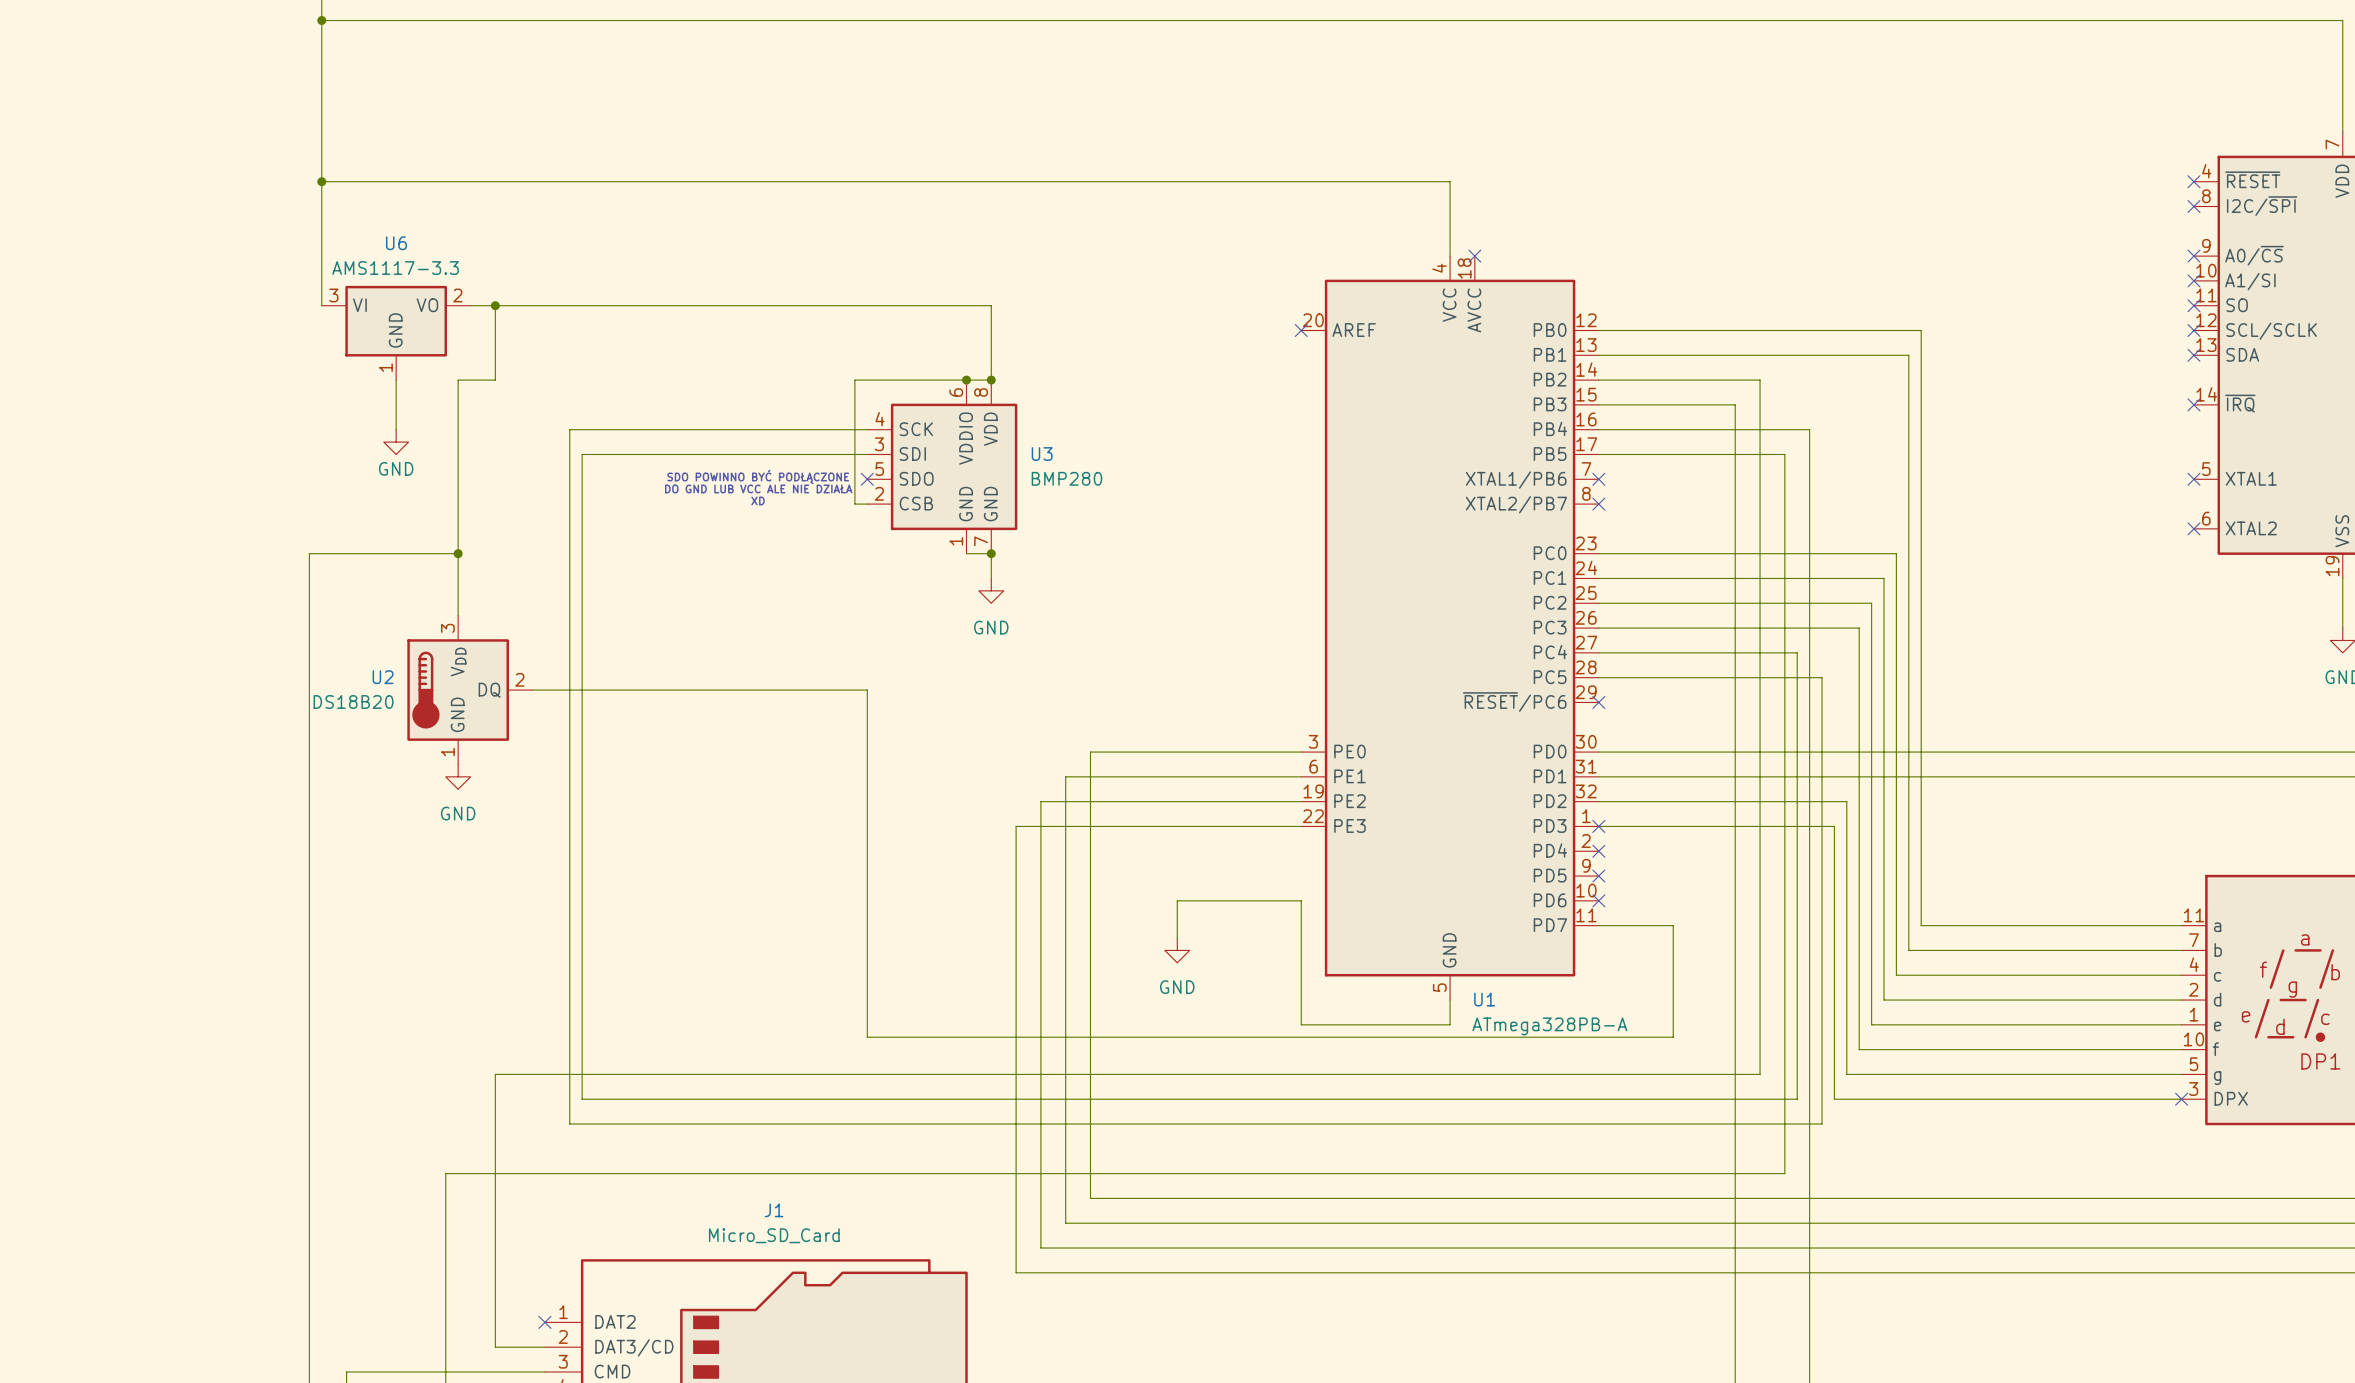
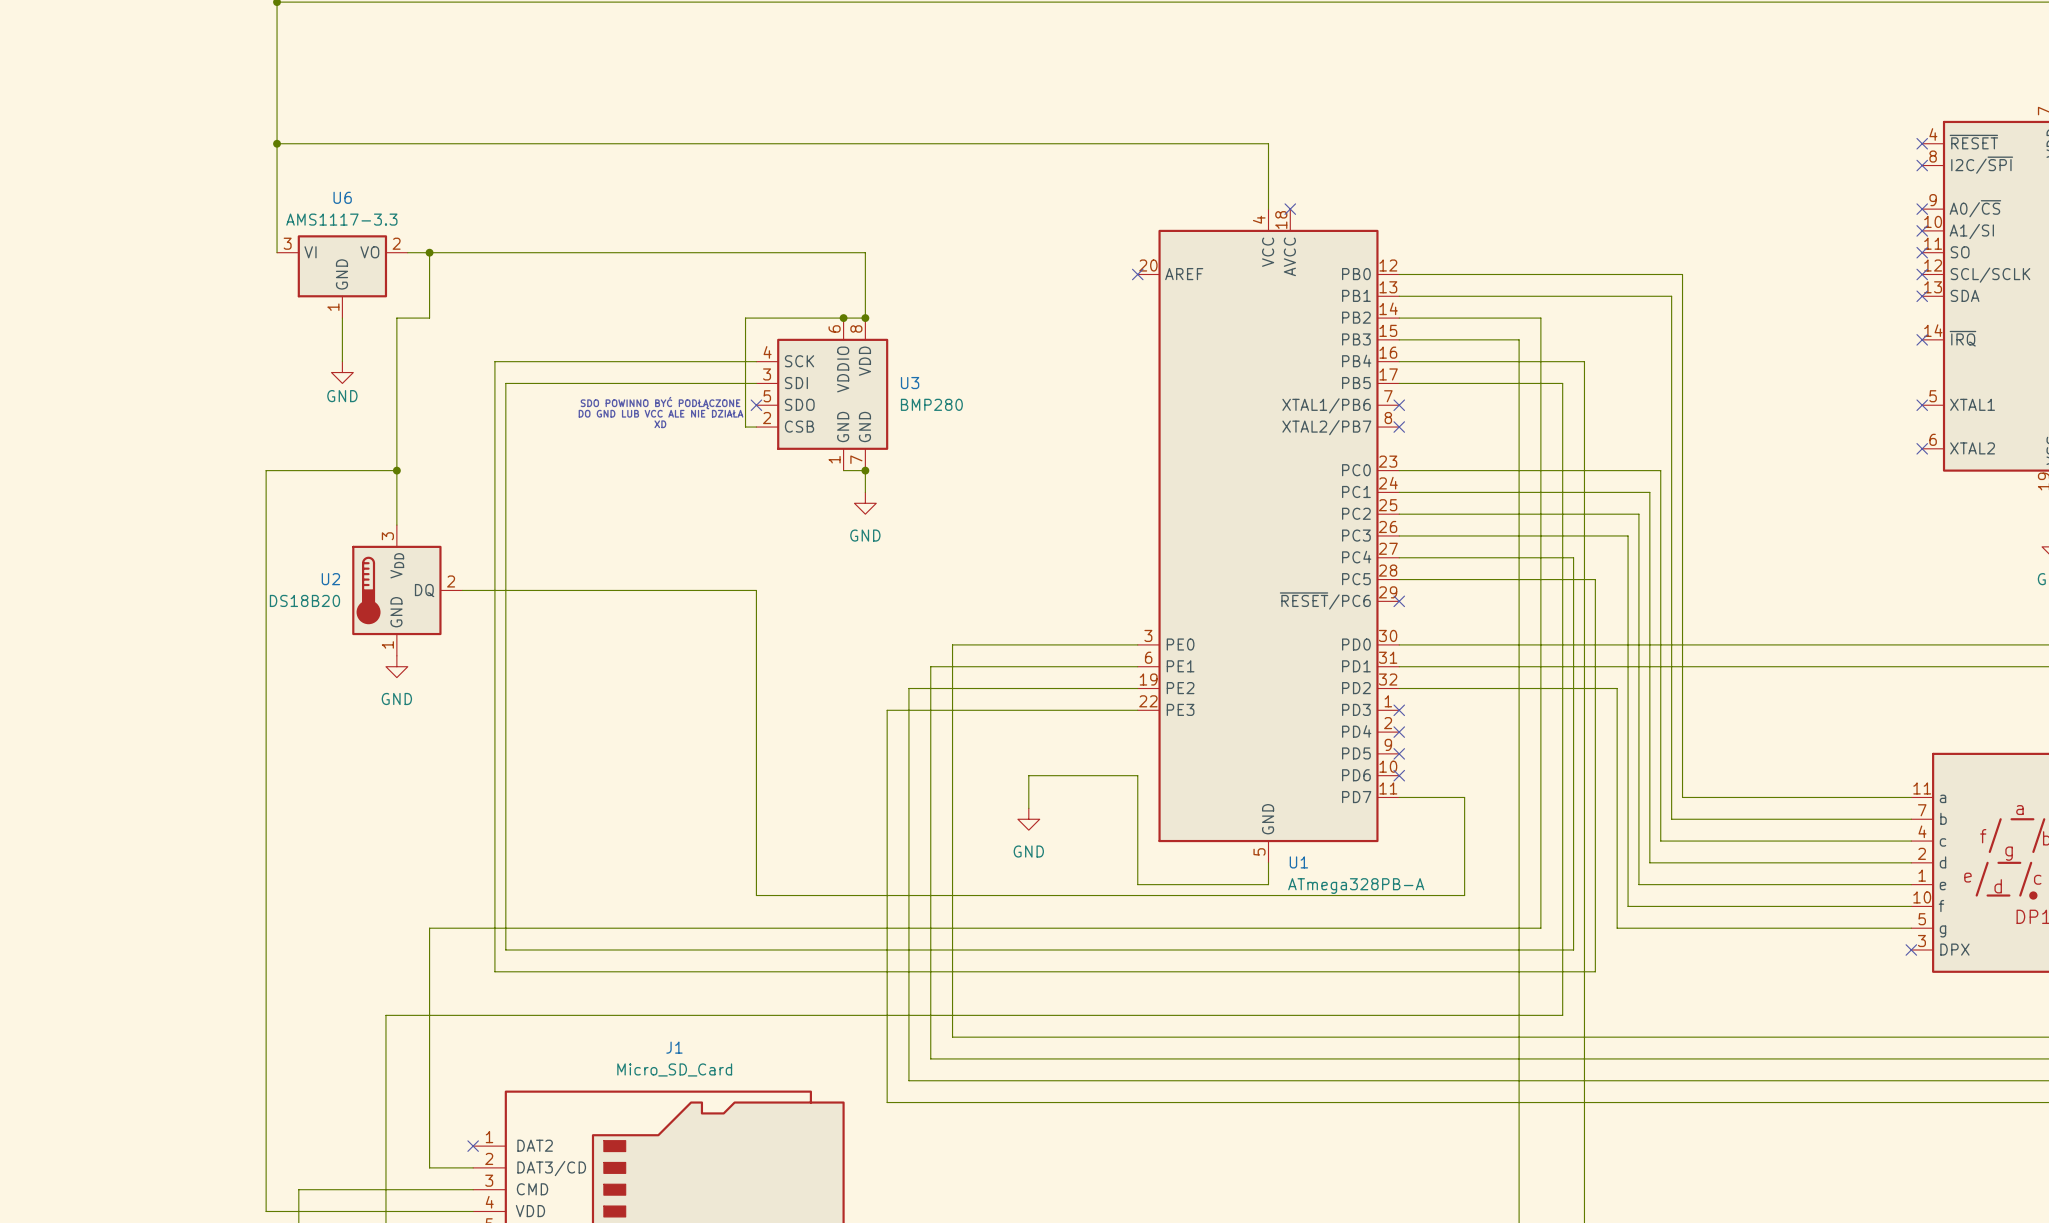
wire: (1598, 826) (1834, 826) (1834, 1099) (2181, 1099) -> none

